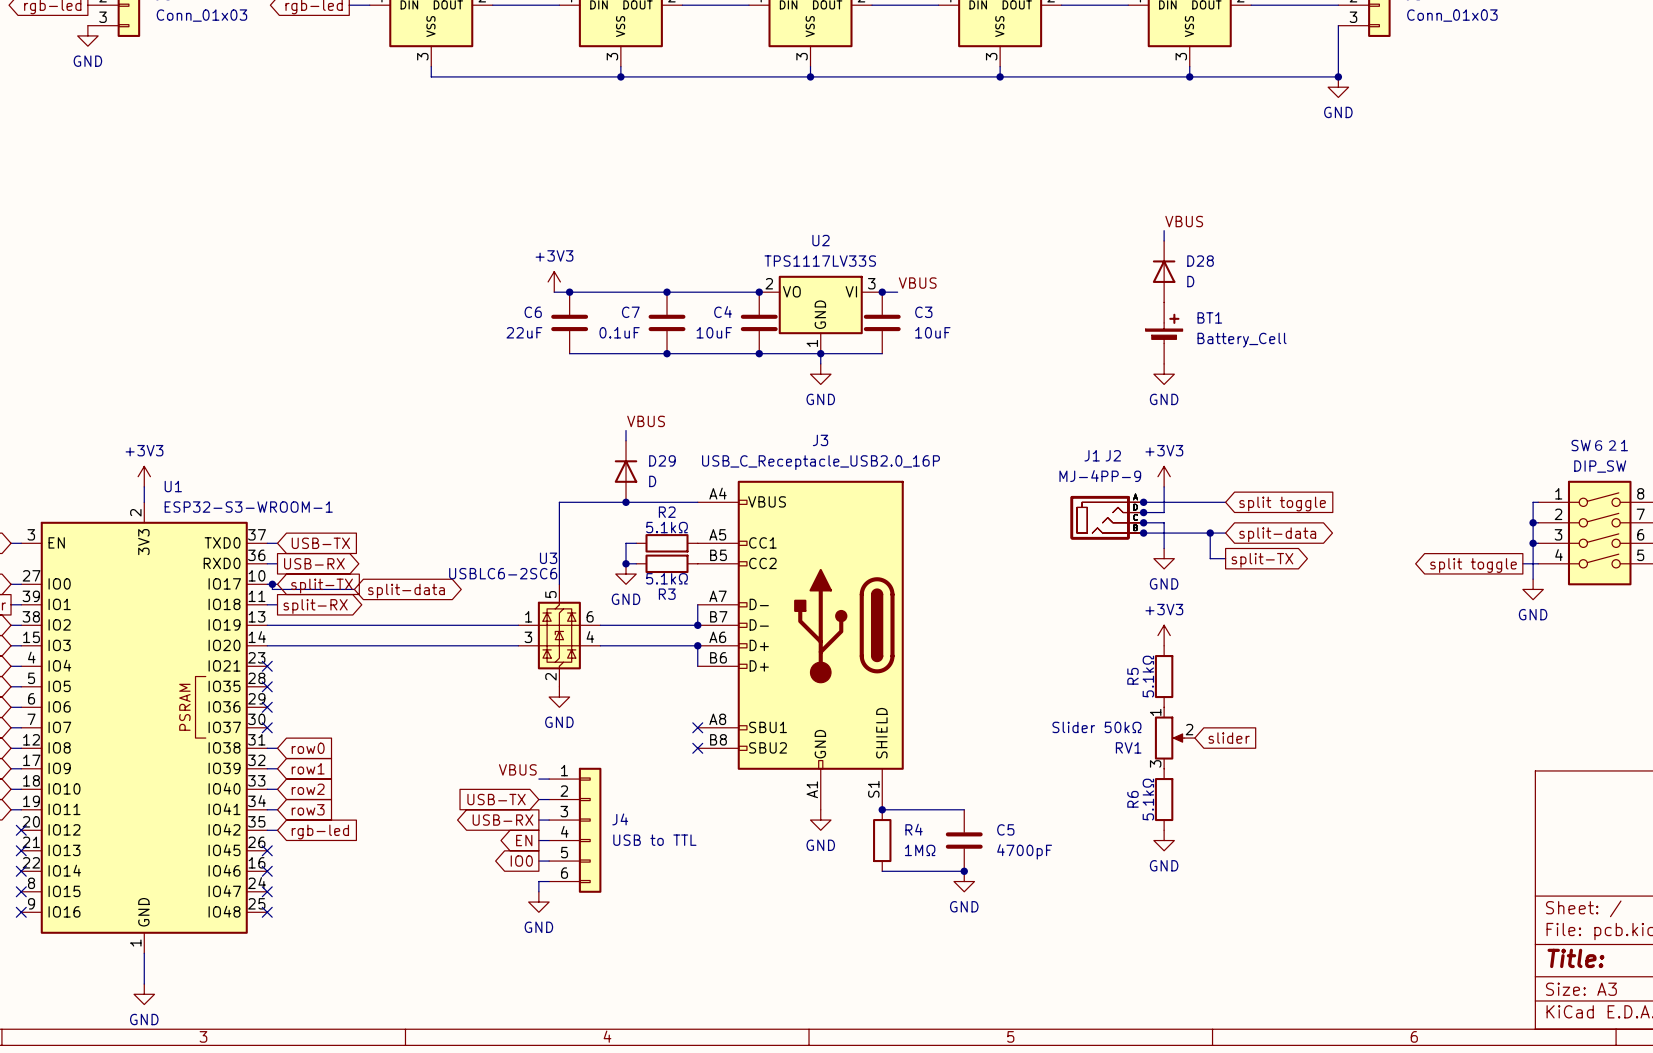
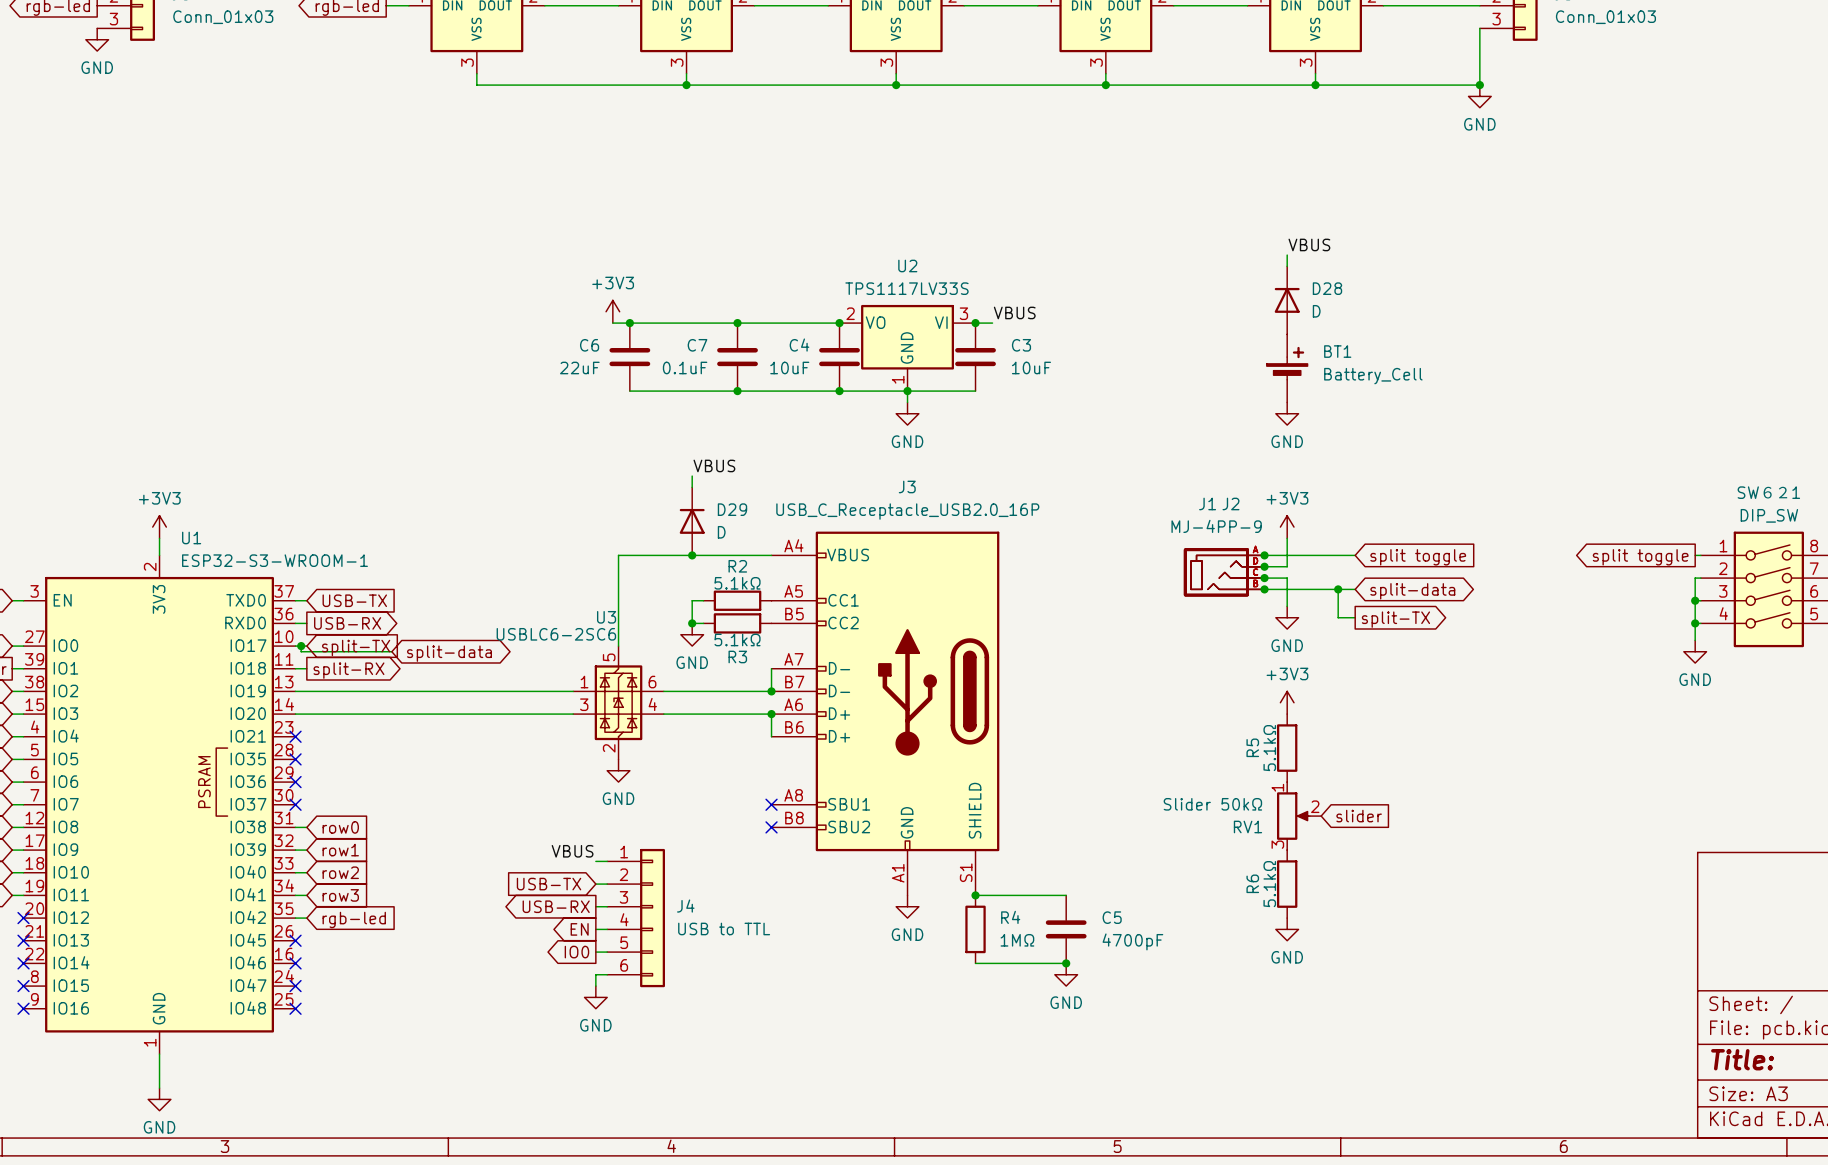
junction position: (1533, 522) -> (1695, 623)
wire: (1522, 563) (1533, 563) -> none
global label position: split toggle (1473, 565) -> split toggle (1640, 557)

